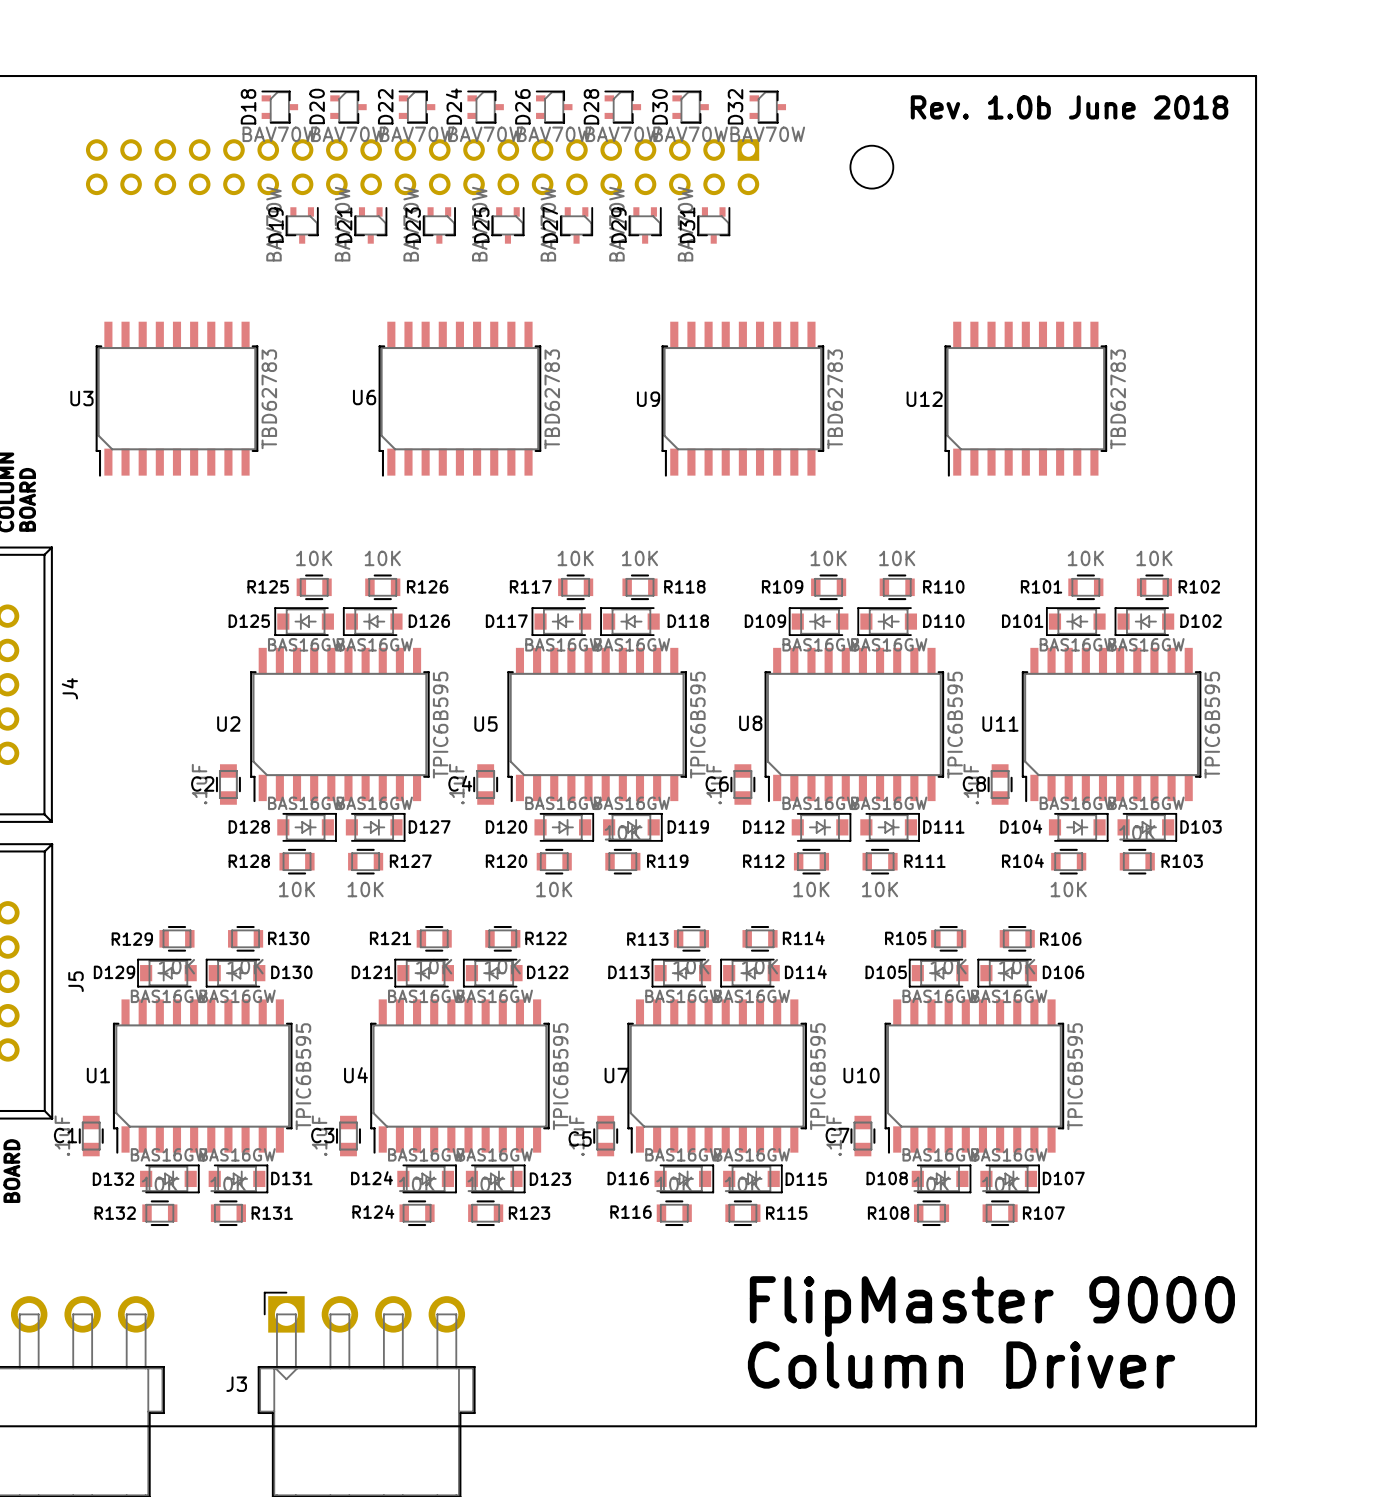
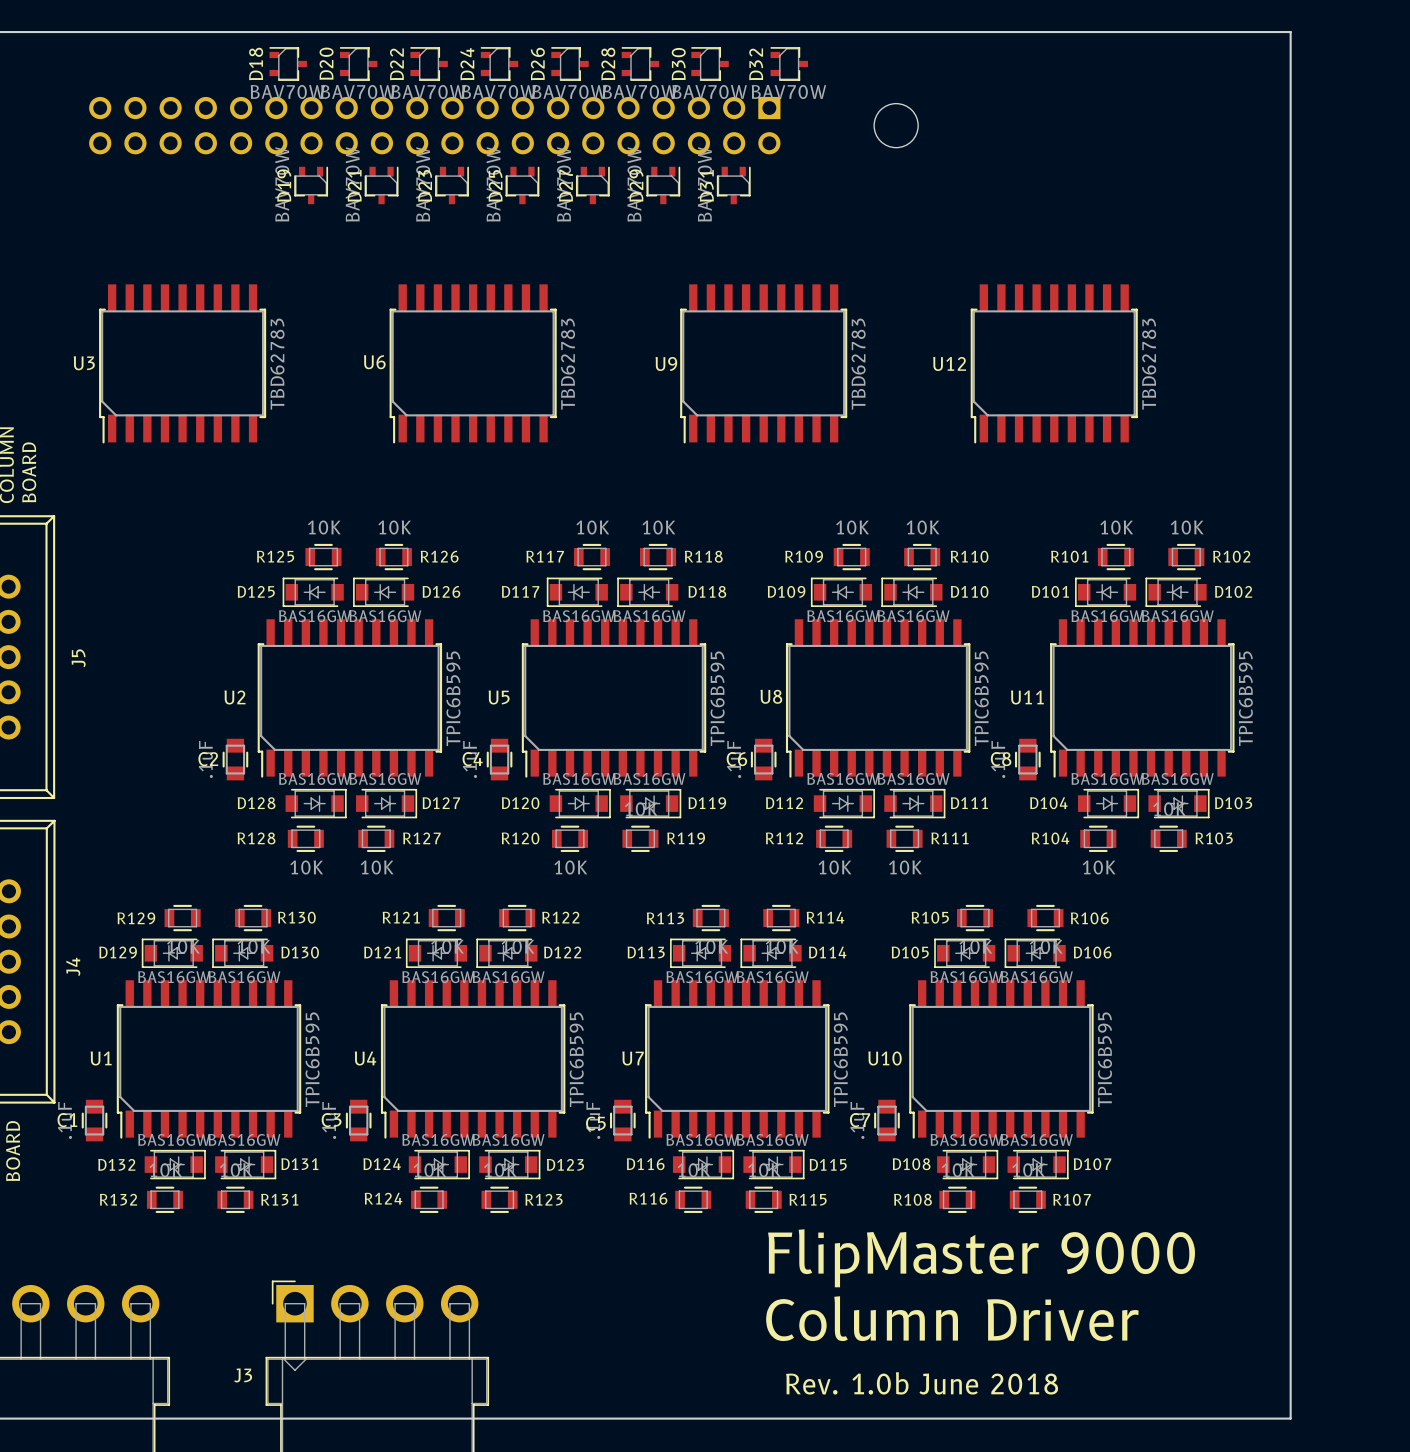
text: Rev. 1.0b June 2018 (1069, 107) -> none
J4 name: J4 (69, 688) -> J5 (78, 658)
J5 name: J5 (75, 981) -> J4 (73, 966)
text position: FlipMaster 9000 (992, 1306) -> FlipMaster 9000 (981, 1258)
text position: Column Driver (961, 1365) -> Column Driver (952, 1318)
text: none -> Rev. 1.0b June 2018 (922, 1383)

